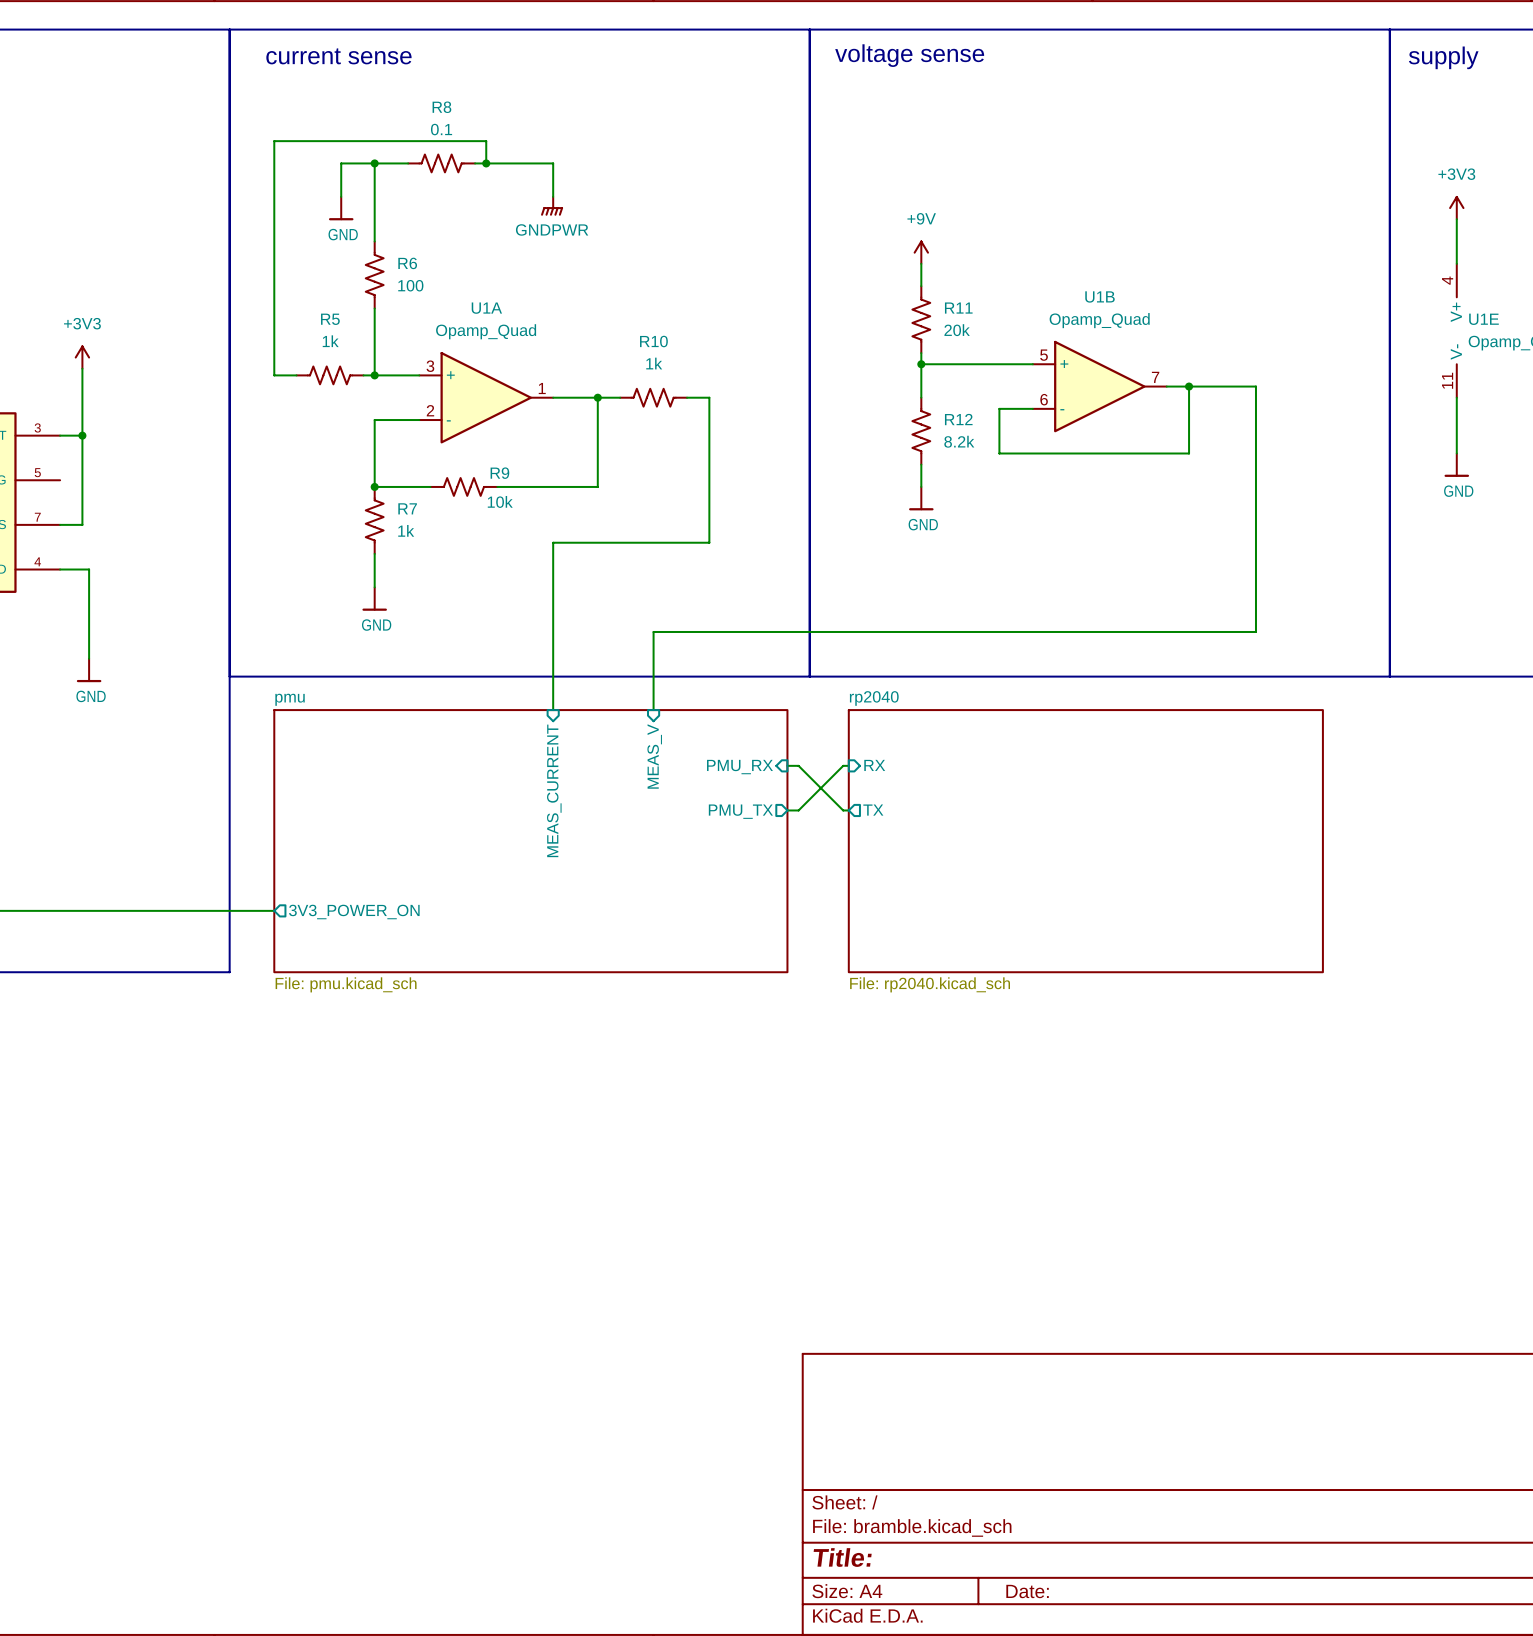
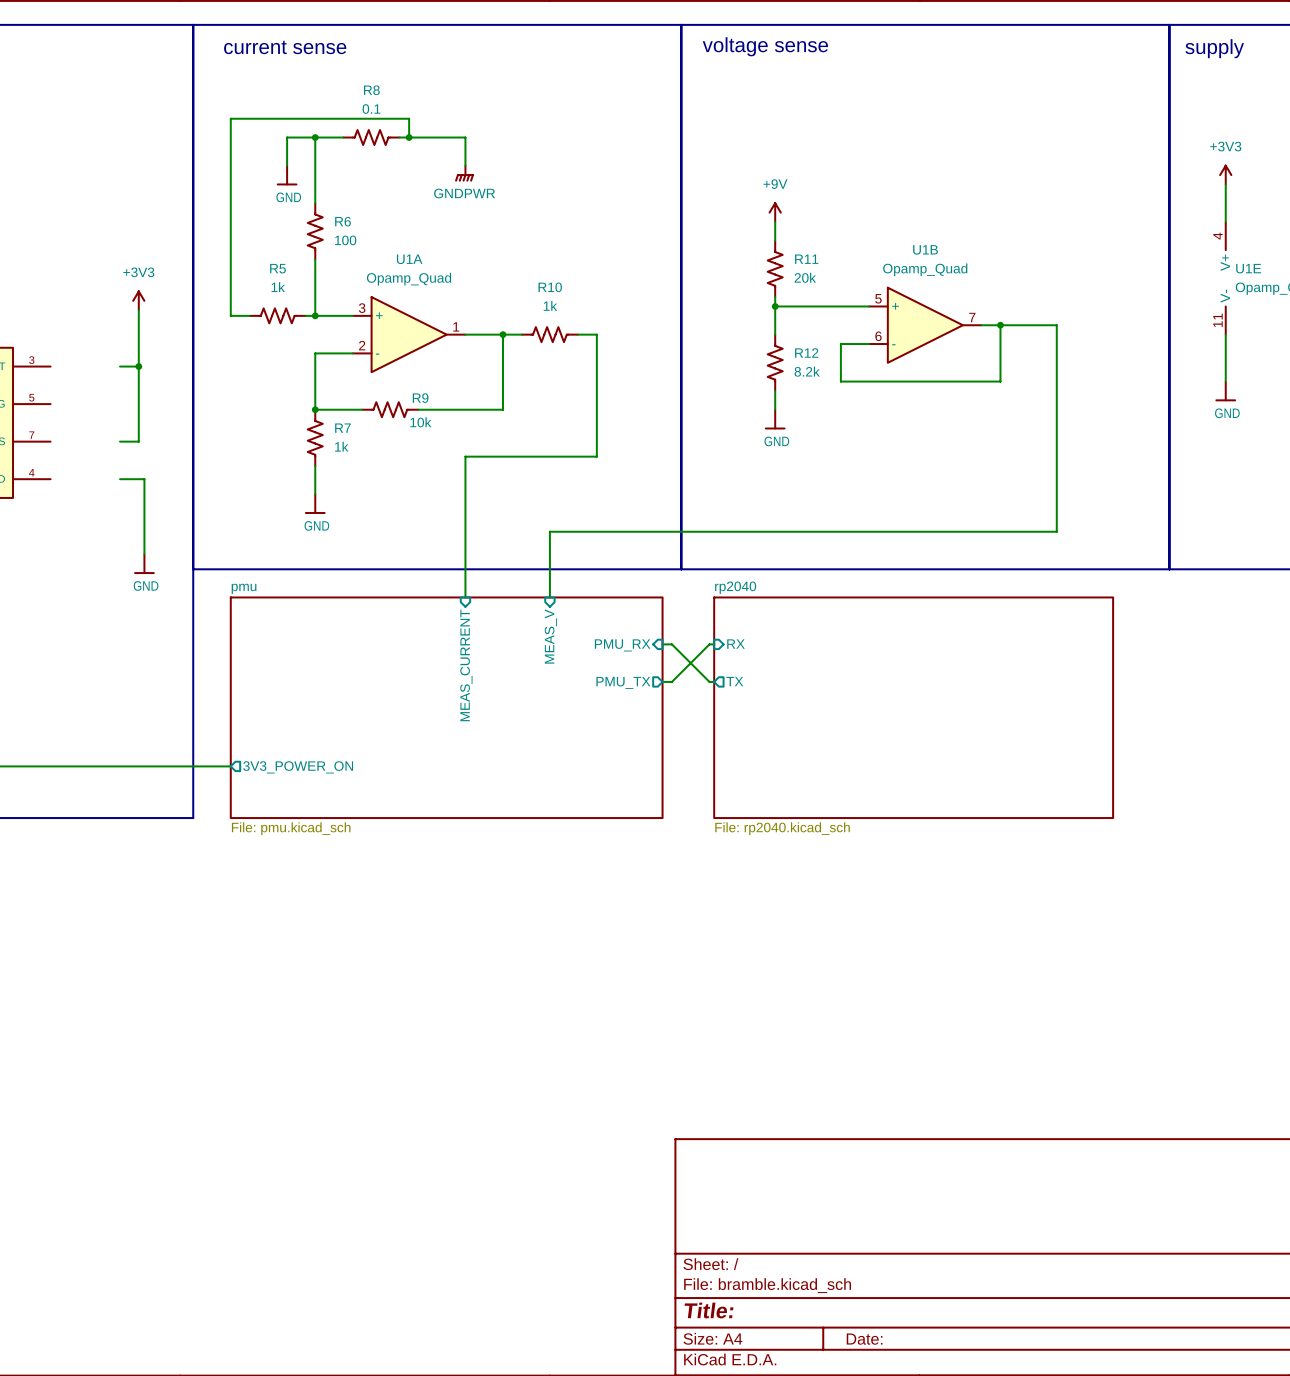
power symbol position: +3V3 (82, 357) -> +3V3 (138, 300)
wire: (82, 368) (82, 524) (60, 524) -> (138, 310) (138, 441) (120, 441)
wire: (60, 435) (82, 435) -> (120, 366) (138, 366)
junction: (82, 435) -> none
junction: none -> (138, 366)
wire: (60, 569) (89, 569) (89, 658) -> (120, 479) (144, 479) (144, 554)
power symbol position: GND (89, 670) -> GND (144, 564)

